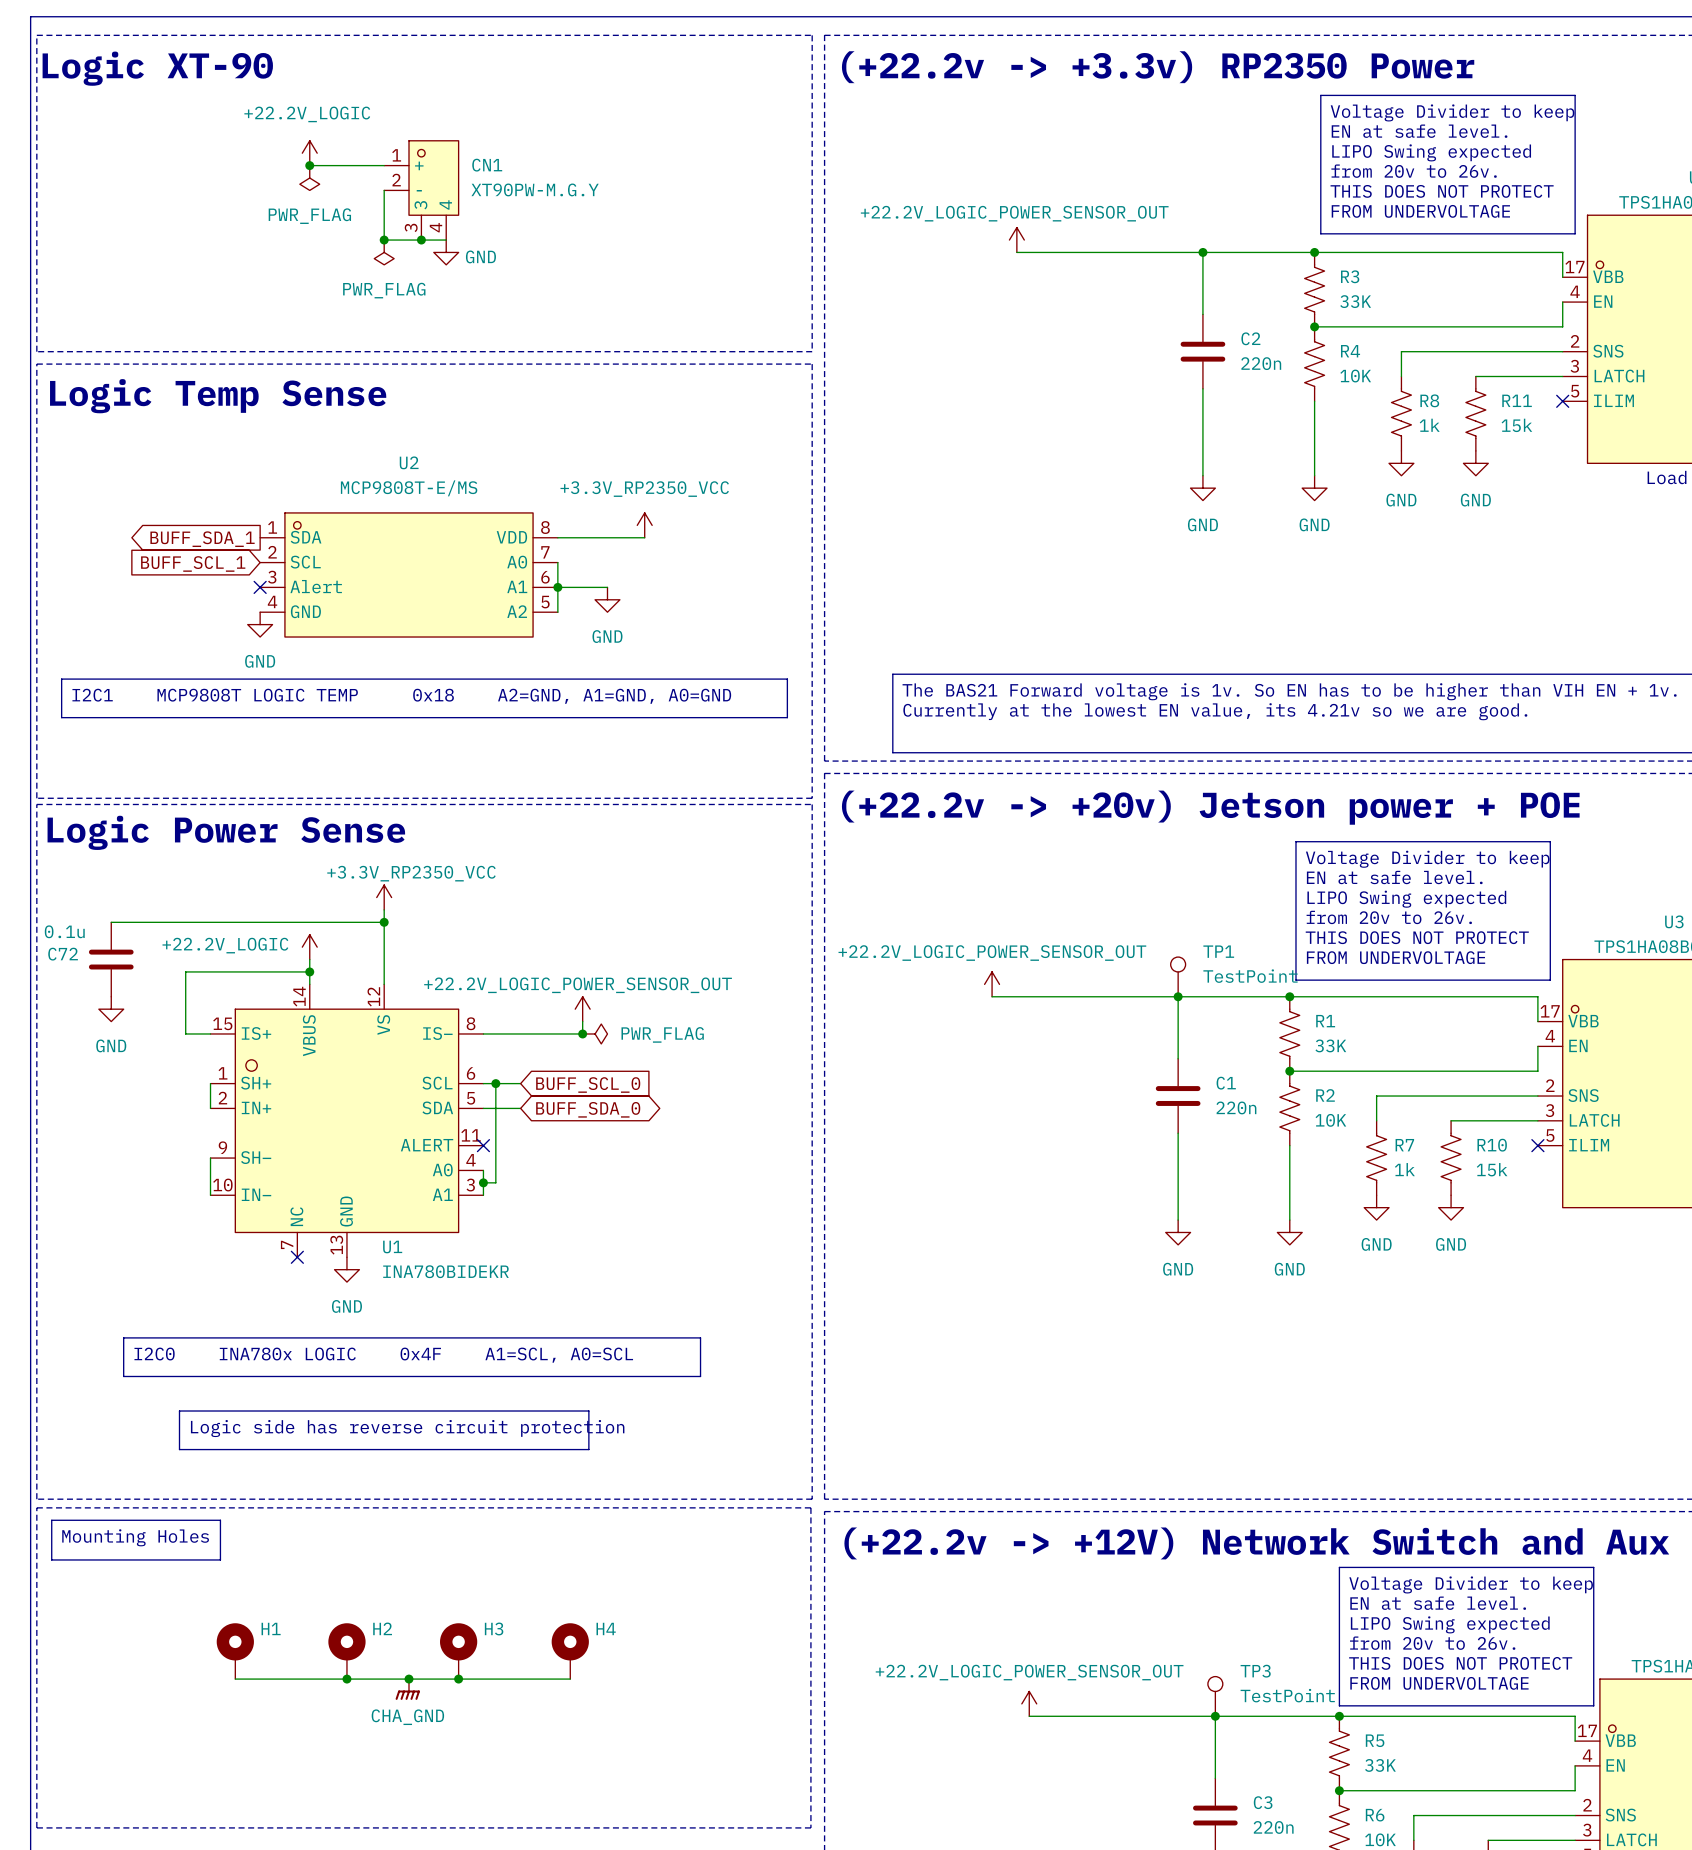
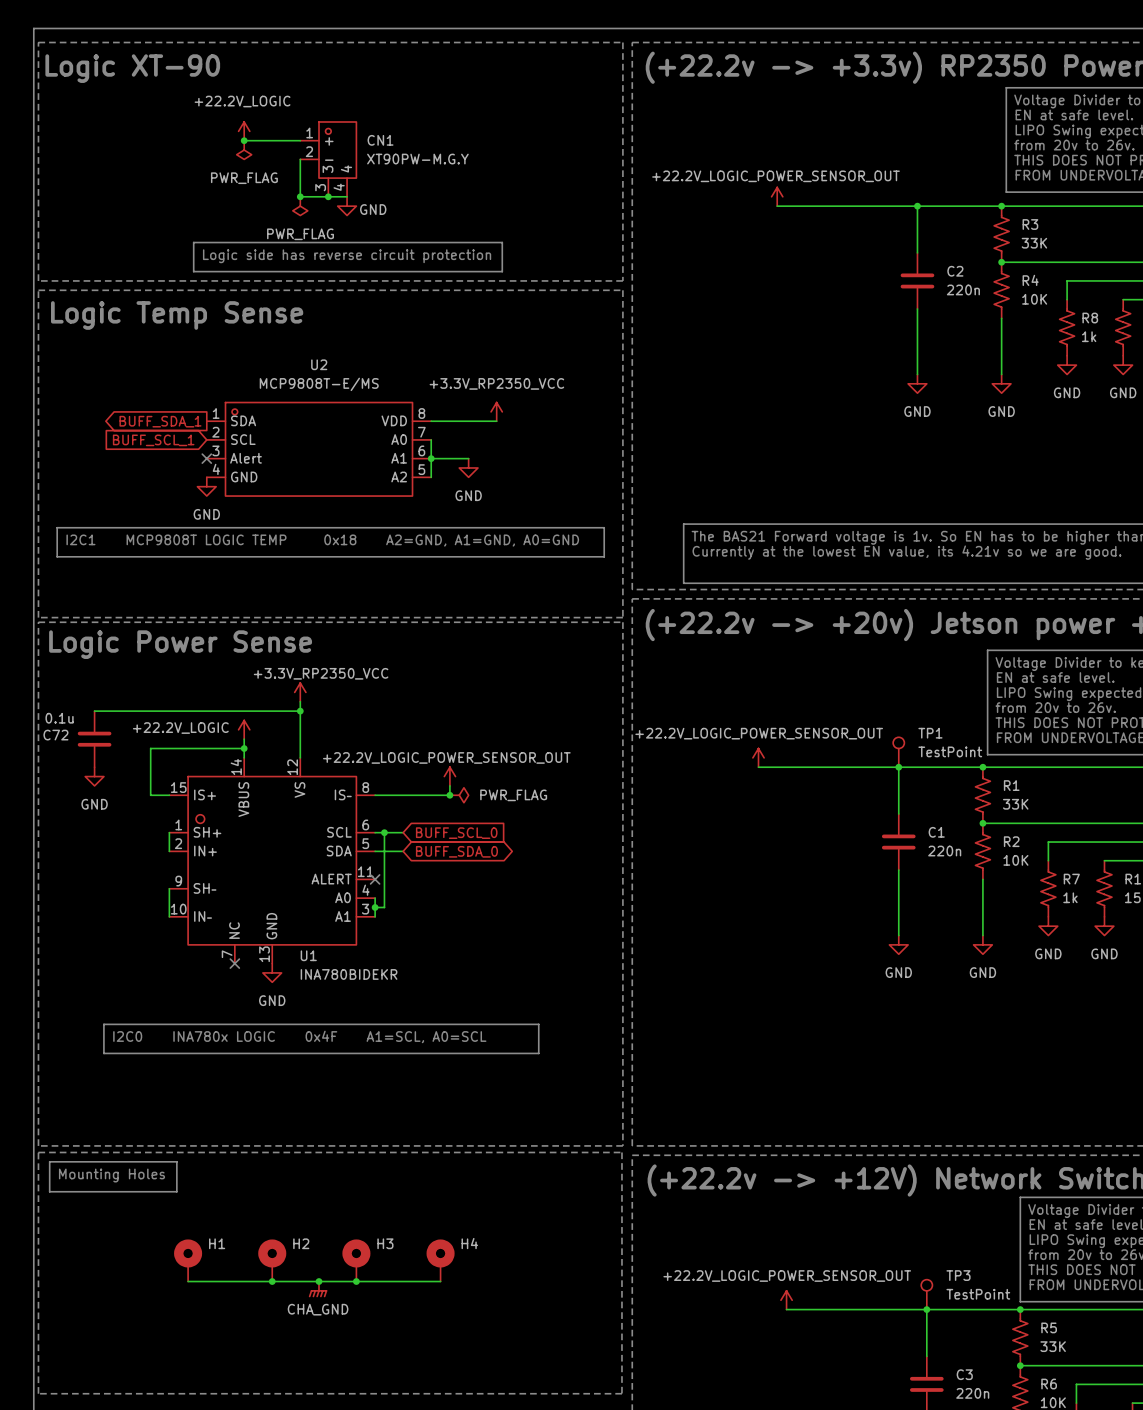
line: none -> (193, 242) (502, 242) (502, 271) (193, 271) (193, 242)
text: none -> Logic side has reverse circuit protection (347, 256)
line: (179, 1411) (588, 1411) (588, 1449) (179, 1449) (179, 1411) -> none
text: Logic side has reverse circuit protection (407, 1428) -> none

